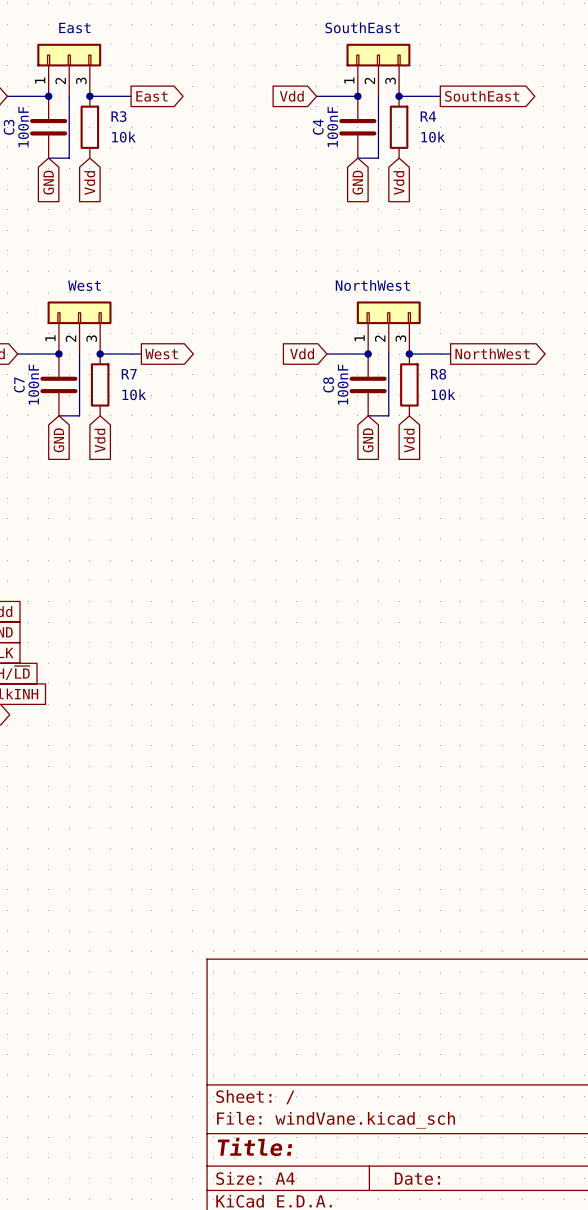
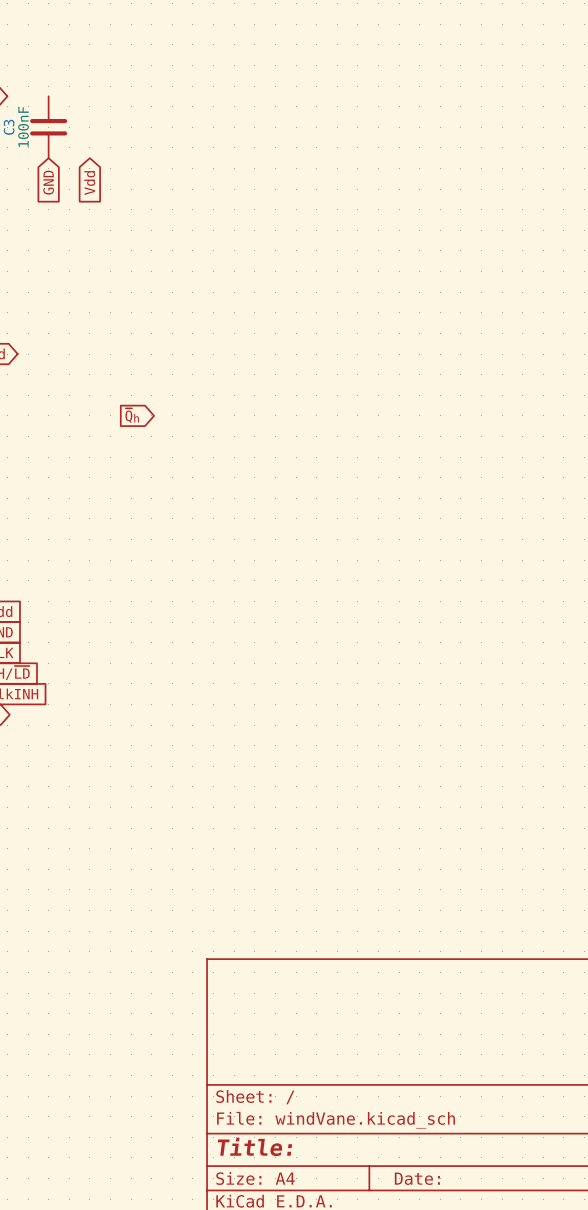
East: (69, 70) -> none
SouthEast: (378, 70) -> none
wire: (7, 96) (48, 96) -> none
junction: (48, 96) -> none
wire: (69, 96) (69, 158) (48, 158) -> none
wire: (89, 96) (131, 96) -> none
junction: (89, 96) -> none
global label: East (151, 96) -> none
global label: Vdd (291, 96) -> none
wire: (316, 96) (357, 96) -> none
junction: (357, 96) -> none
wire: (378, 96) (378, 158) (357, 158) -> none
wire: (399, 96) (440, 96) -> none
junction: (399, 96) -> none
global label: SouthEast (482, 96) -> none
R3: 10k (89, 127) -> none
C4: 100nF (357, 127) -> none
R4: 10k (399, 127) -> none
global label: GND (357, 182) -> none
global label: Vdd (398, 183) -> none
West: (79, 327) -> none
NorthWest: (388, 327) -> none
global label: Vdd (302, 353) -> none
global label: NorthWest (492, 353) -> none
wire: (17, 354) (58, 354) -> none
junction: (58, 354) -> none
wire: (79, 354) (79, 415) (58, 415) -> none
wire: (100, 354) (141, 354) -> none
junction: (100, 354) -> none
global label: West (161, 354) -> none
wire: (326, 354) (368, 354) -> none
junction: (368, 354) -> none
wire: (388, 354) (388, 415) (368, 415) -> none
wire: (409, 354) (450, 354) -> none
junction: (409, 354) -> none
C7: 100nF (58, 384) -> none
R7: 10k (100, 384) -> none
C8: 100nF (368, 384) -> none
R8: 10k (409, 384) -> none
global label: none -> ~{Q}h (132, 415)
global label: GND (58, 440) -> none
global label: Vdd (100, 440) -> none
global label: GND (368, 440) -> none
global label: Vdd (409, 440) -> none

